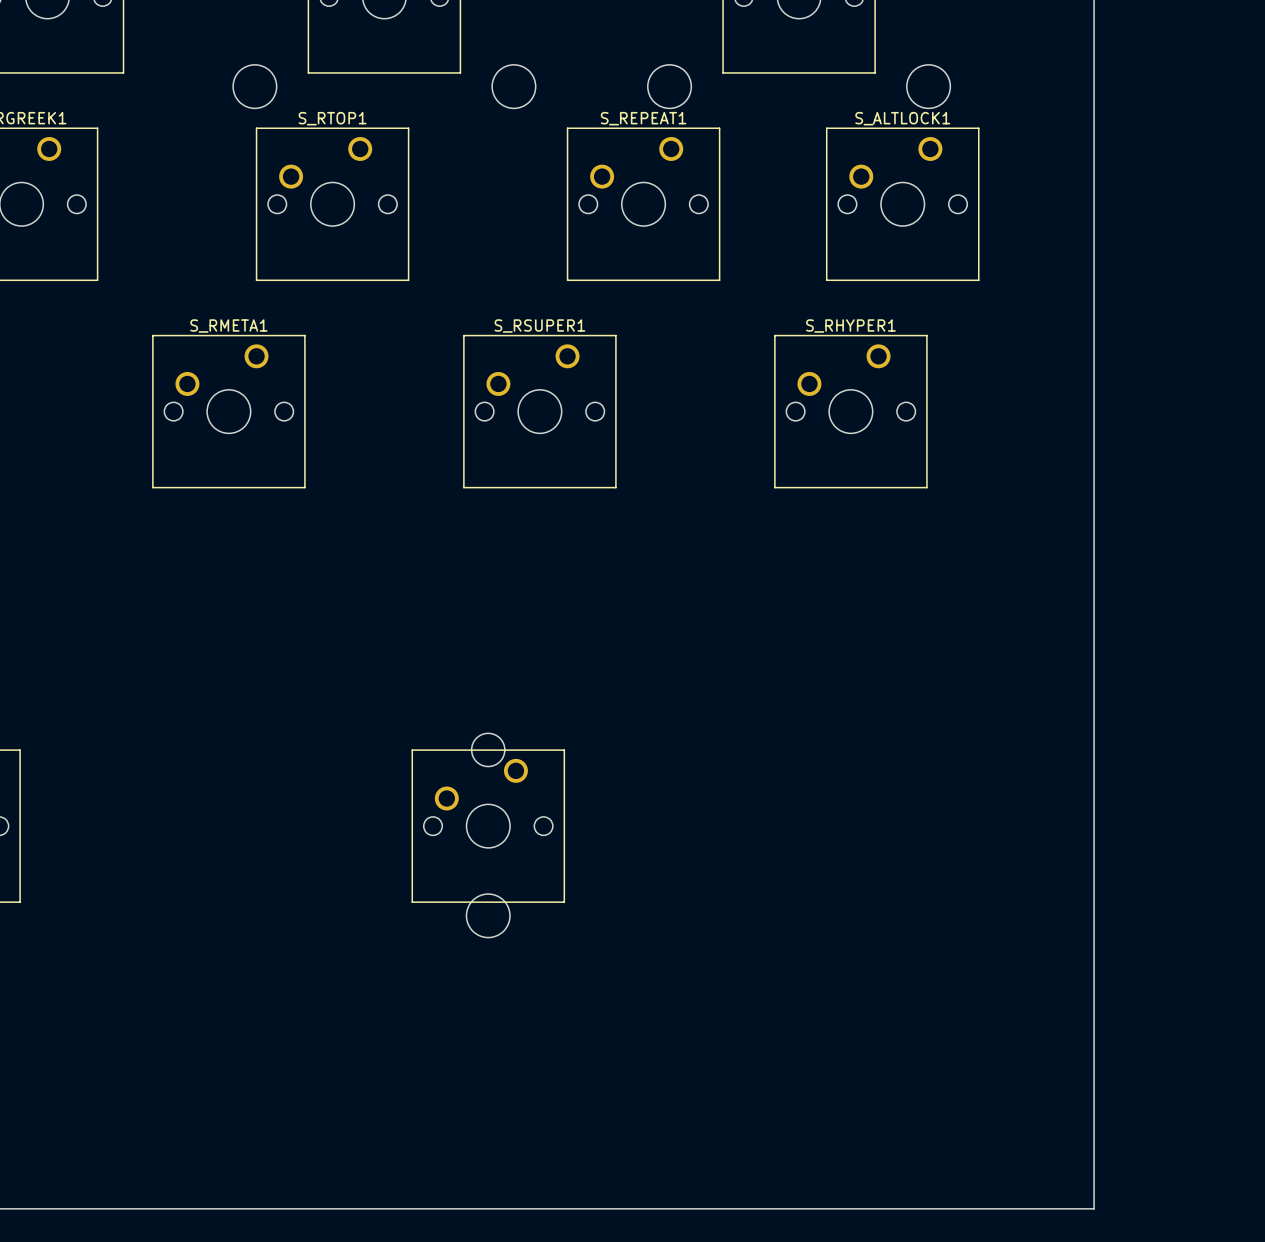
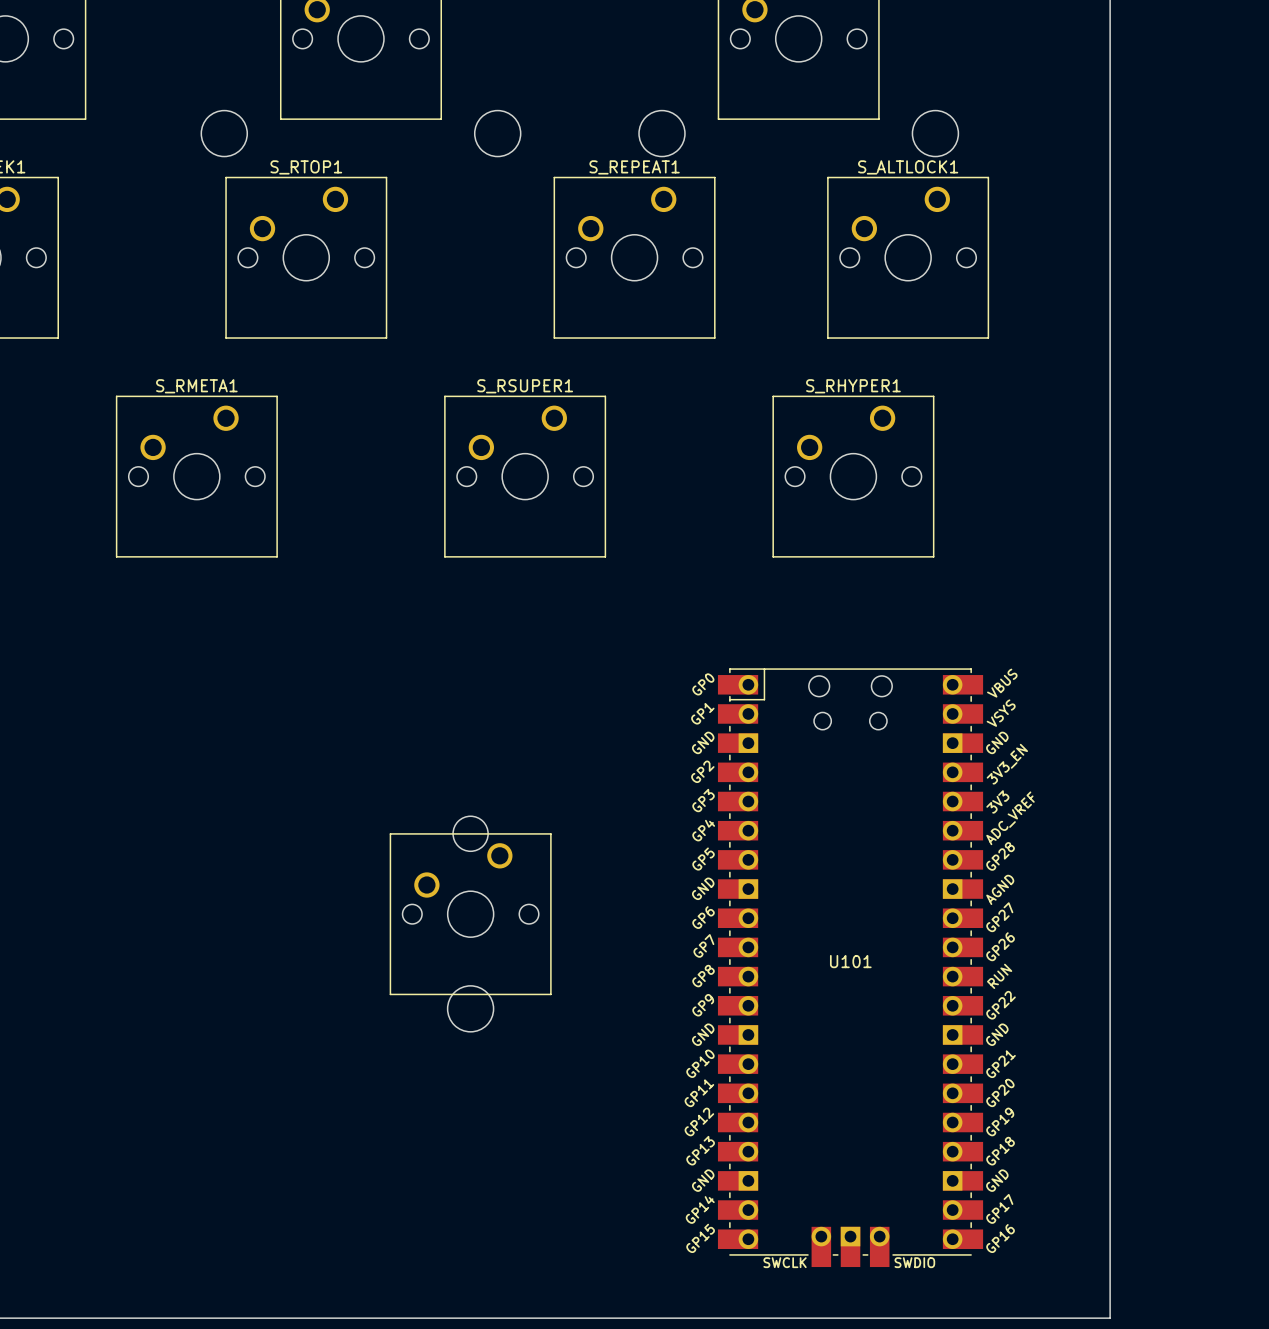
U101: none -> (850, 967)

